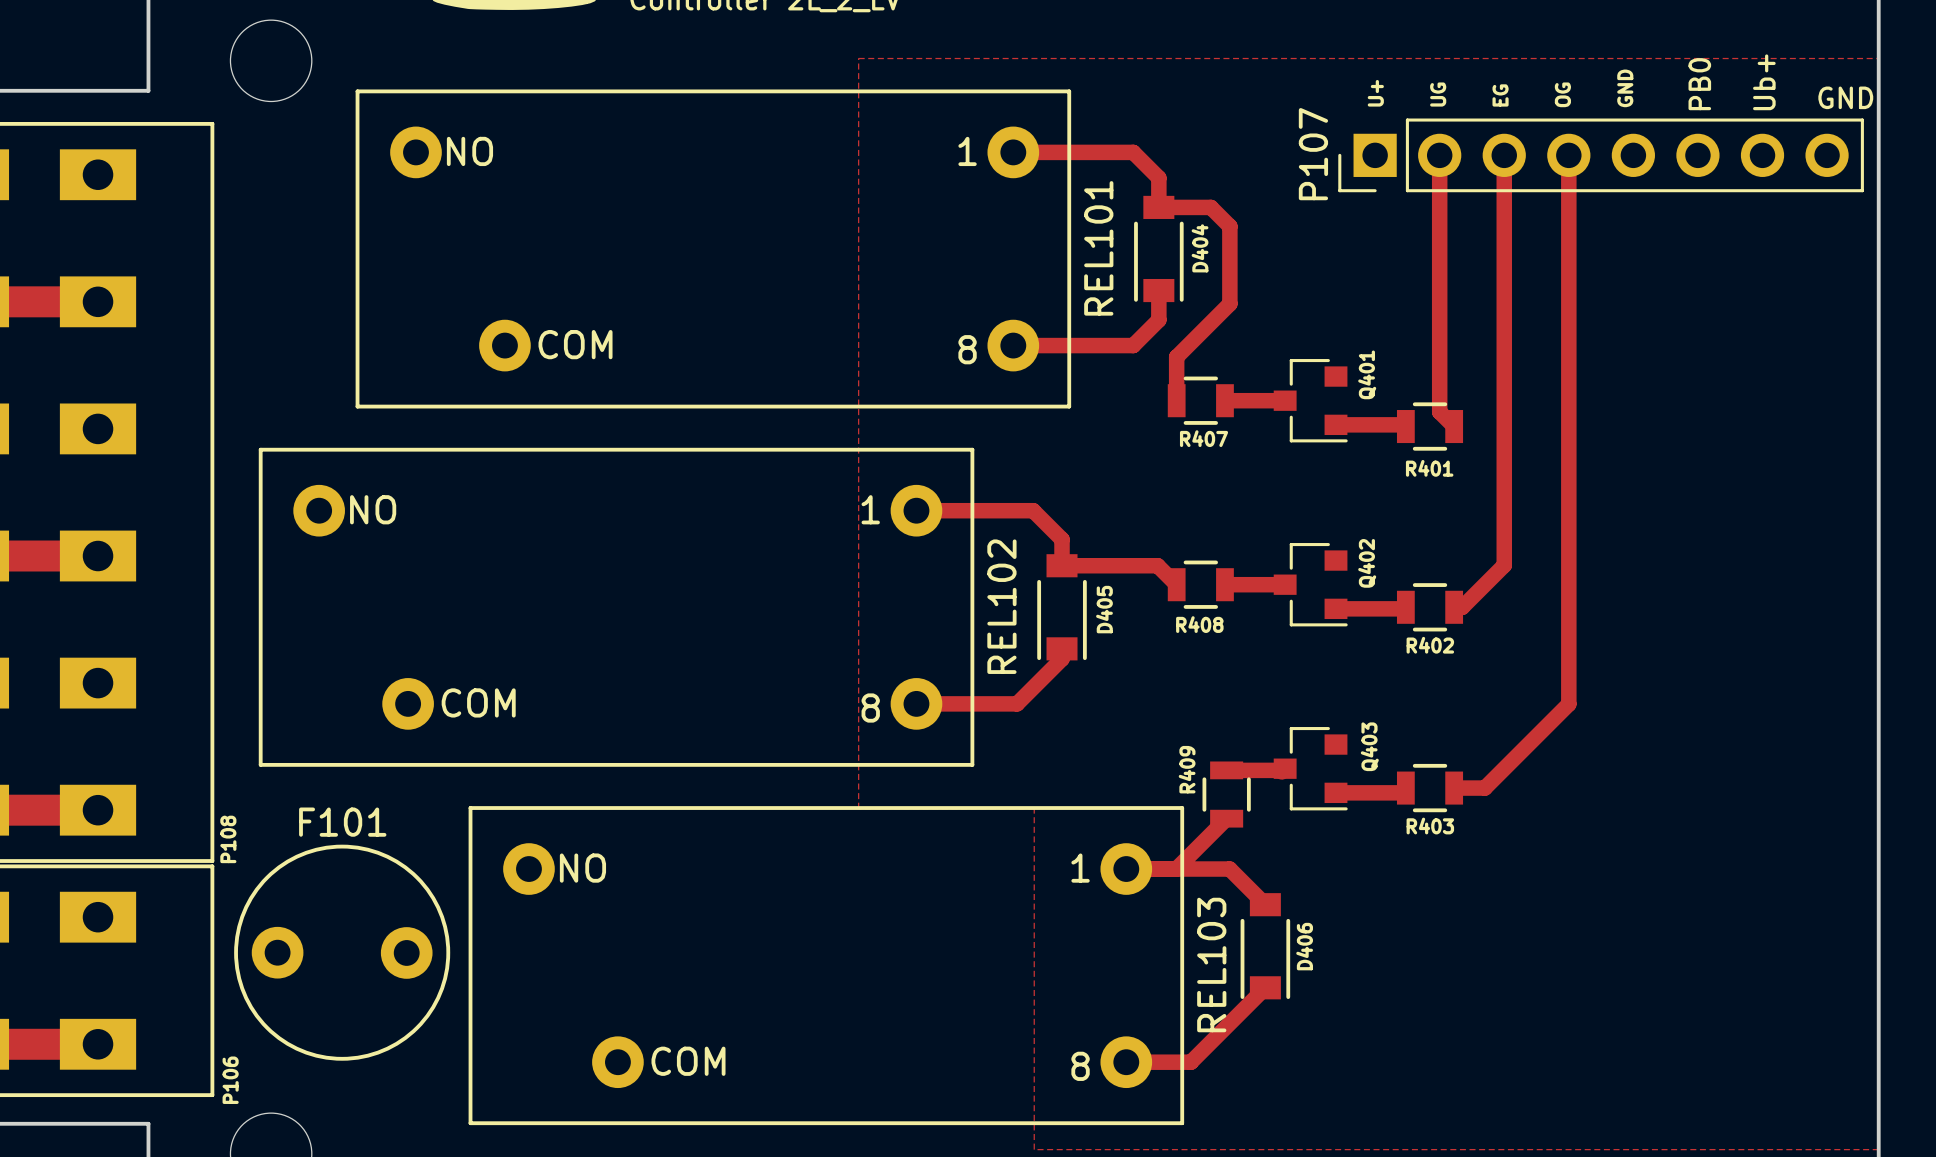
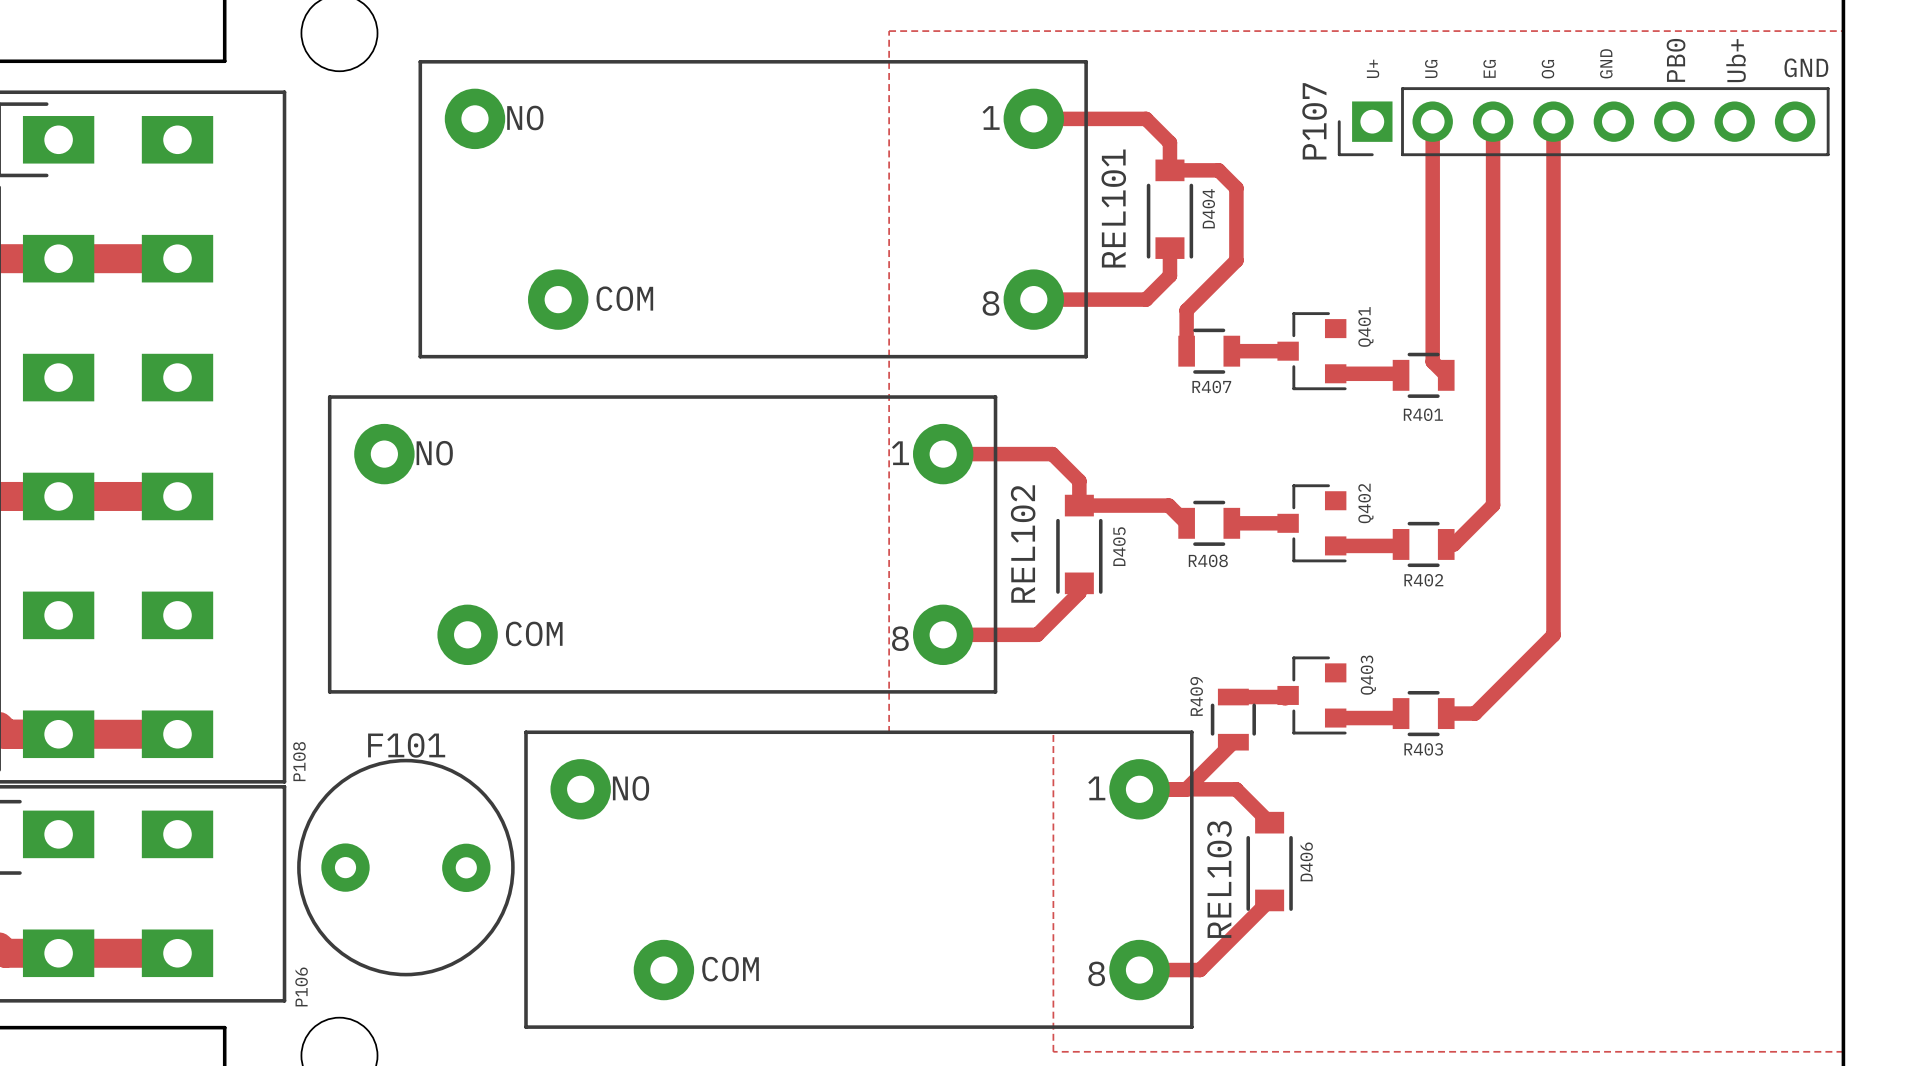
REL101 footprint: [355, 89, 1072, 409] -> [418, 60, 1088, 359]
REL102 footprint: [258, 447, 975, 767] -> [327, 395, 998, 694]
REL103 footprint: [468, 806, 1185, 1126] -> [524, 730, 1194, 1029]
F101 footprint: [234, 844, 451, 1061] -> [297, 758, 515, 977]

